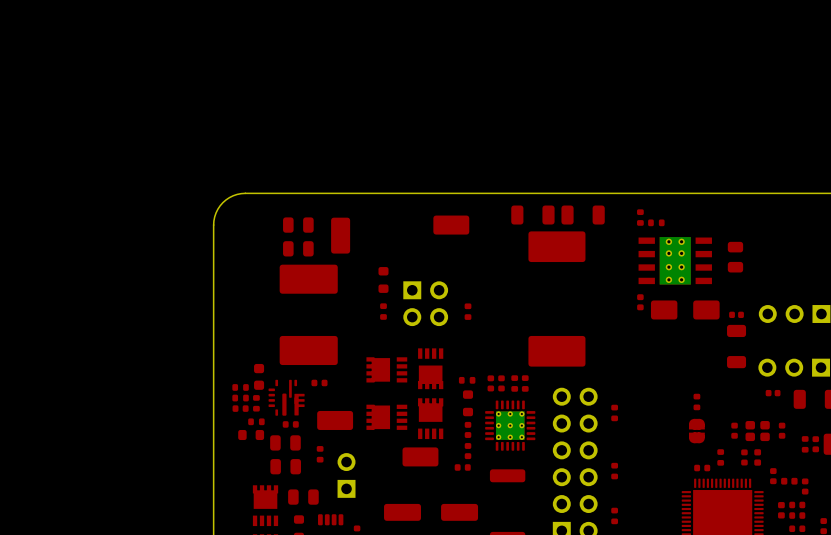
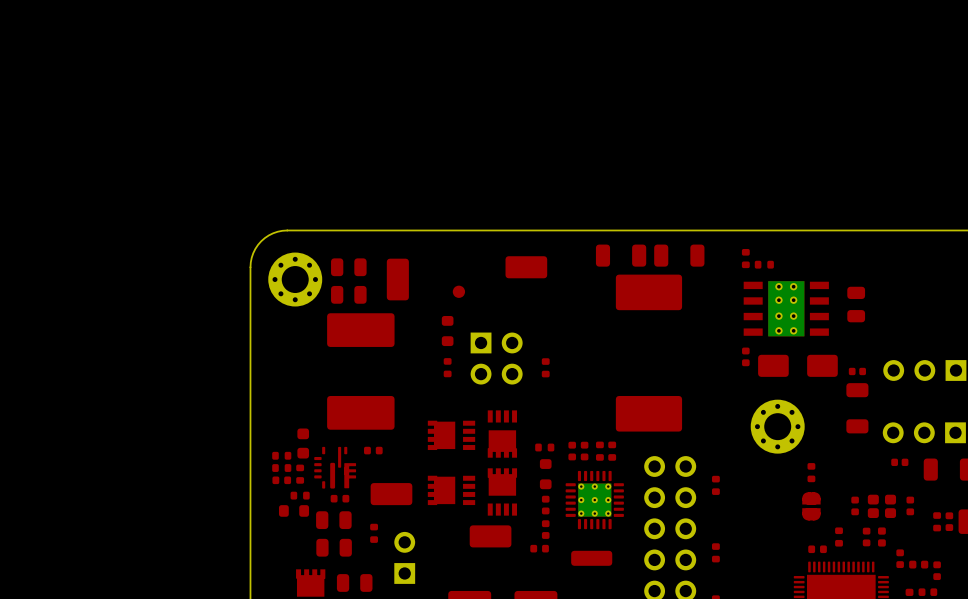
part: none -> (295, 279)
part: none -> (458, 291)
part: none -> (777, 426)

